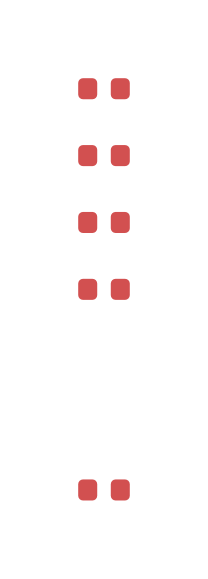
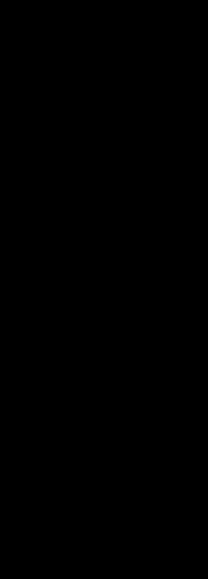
part: (103, 88) -> none
part: (103, 155) -> none
part: (103, 222) -> none
part: (103, 289) -> none
part: (103, 489) -> none

